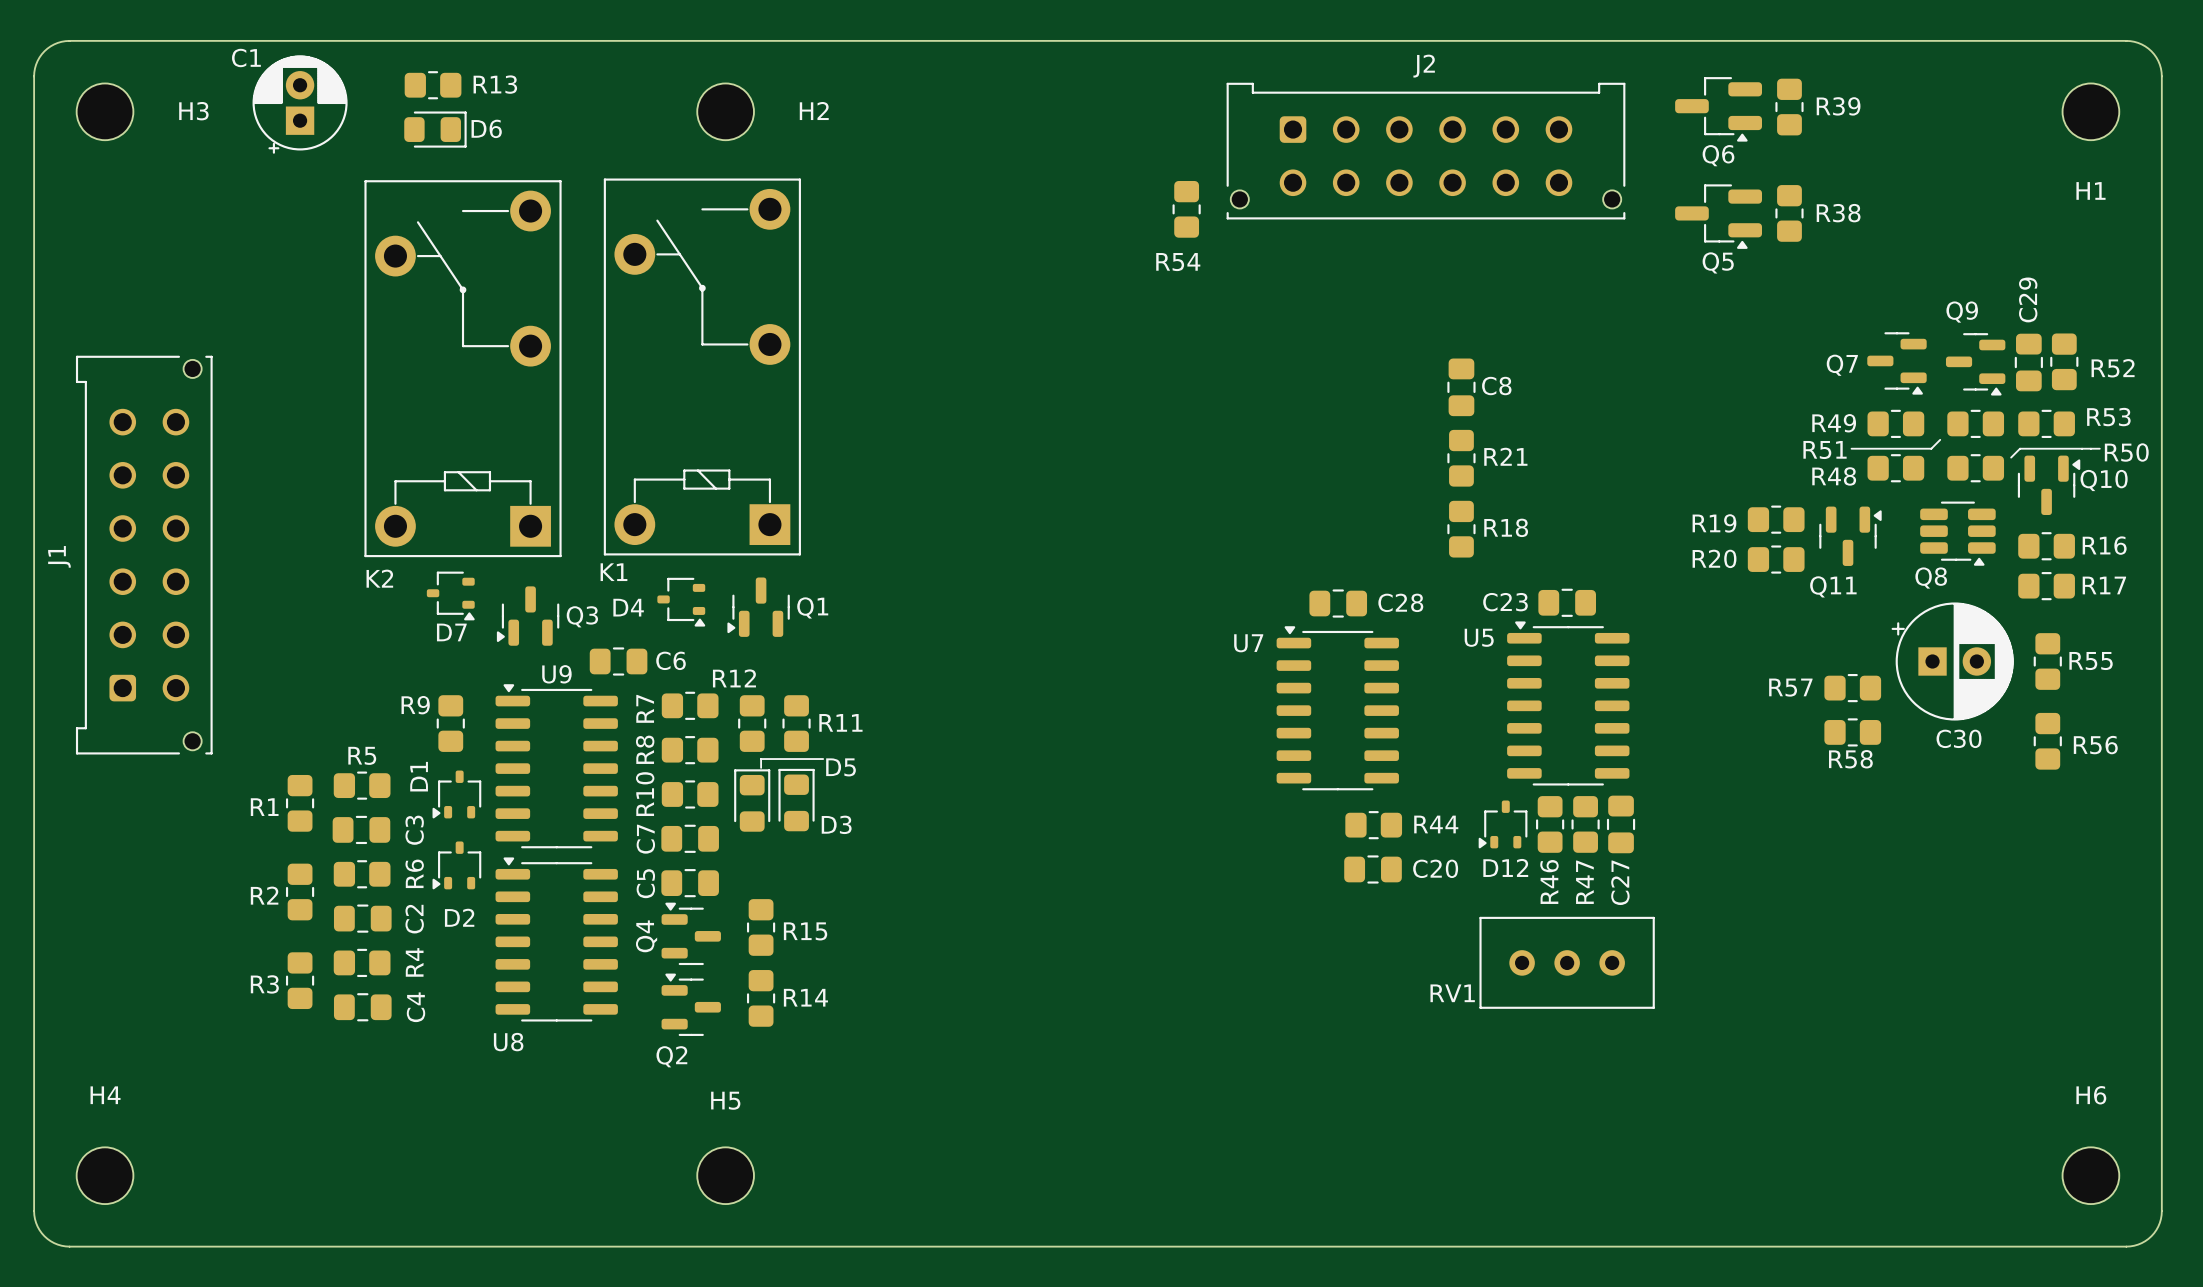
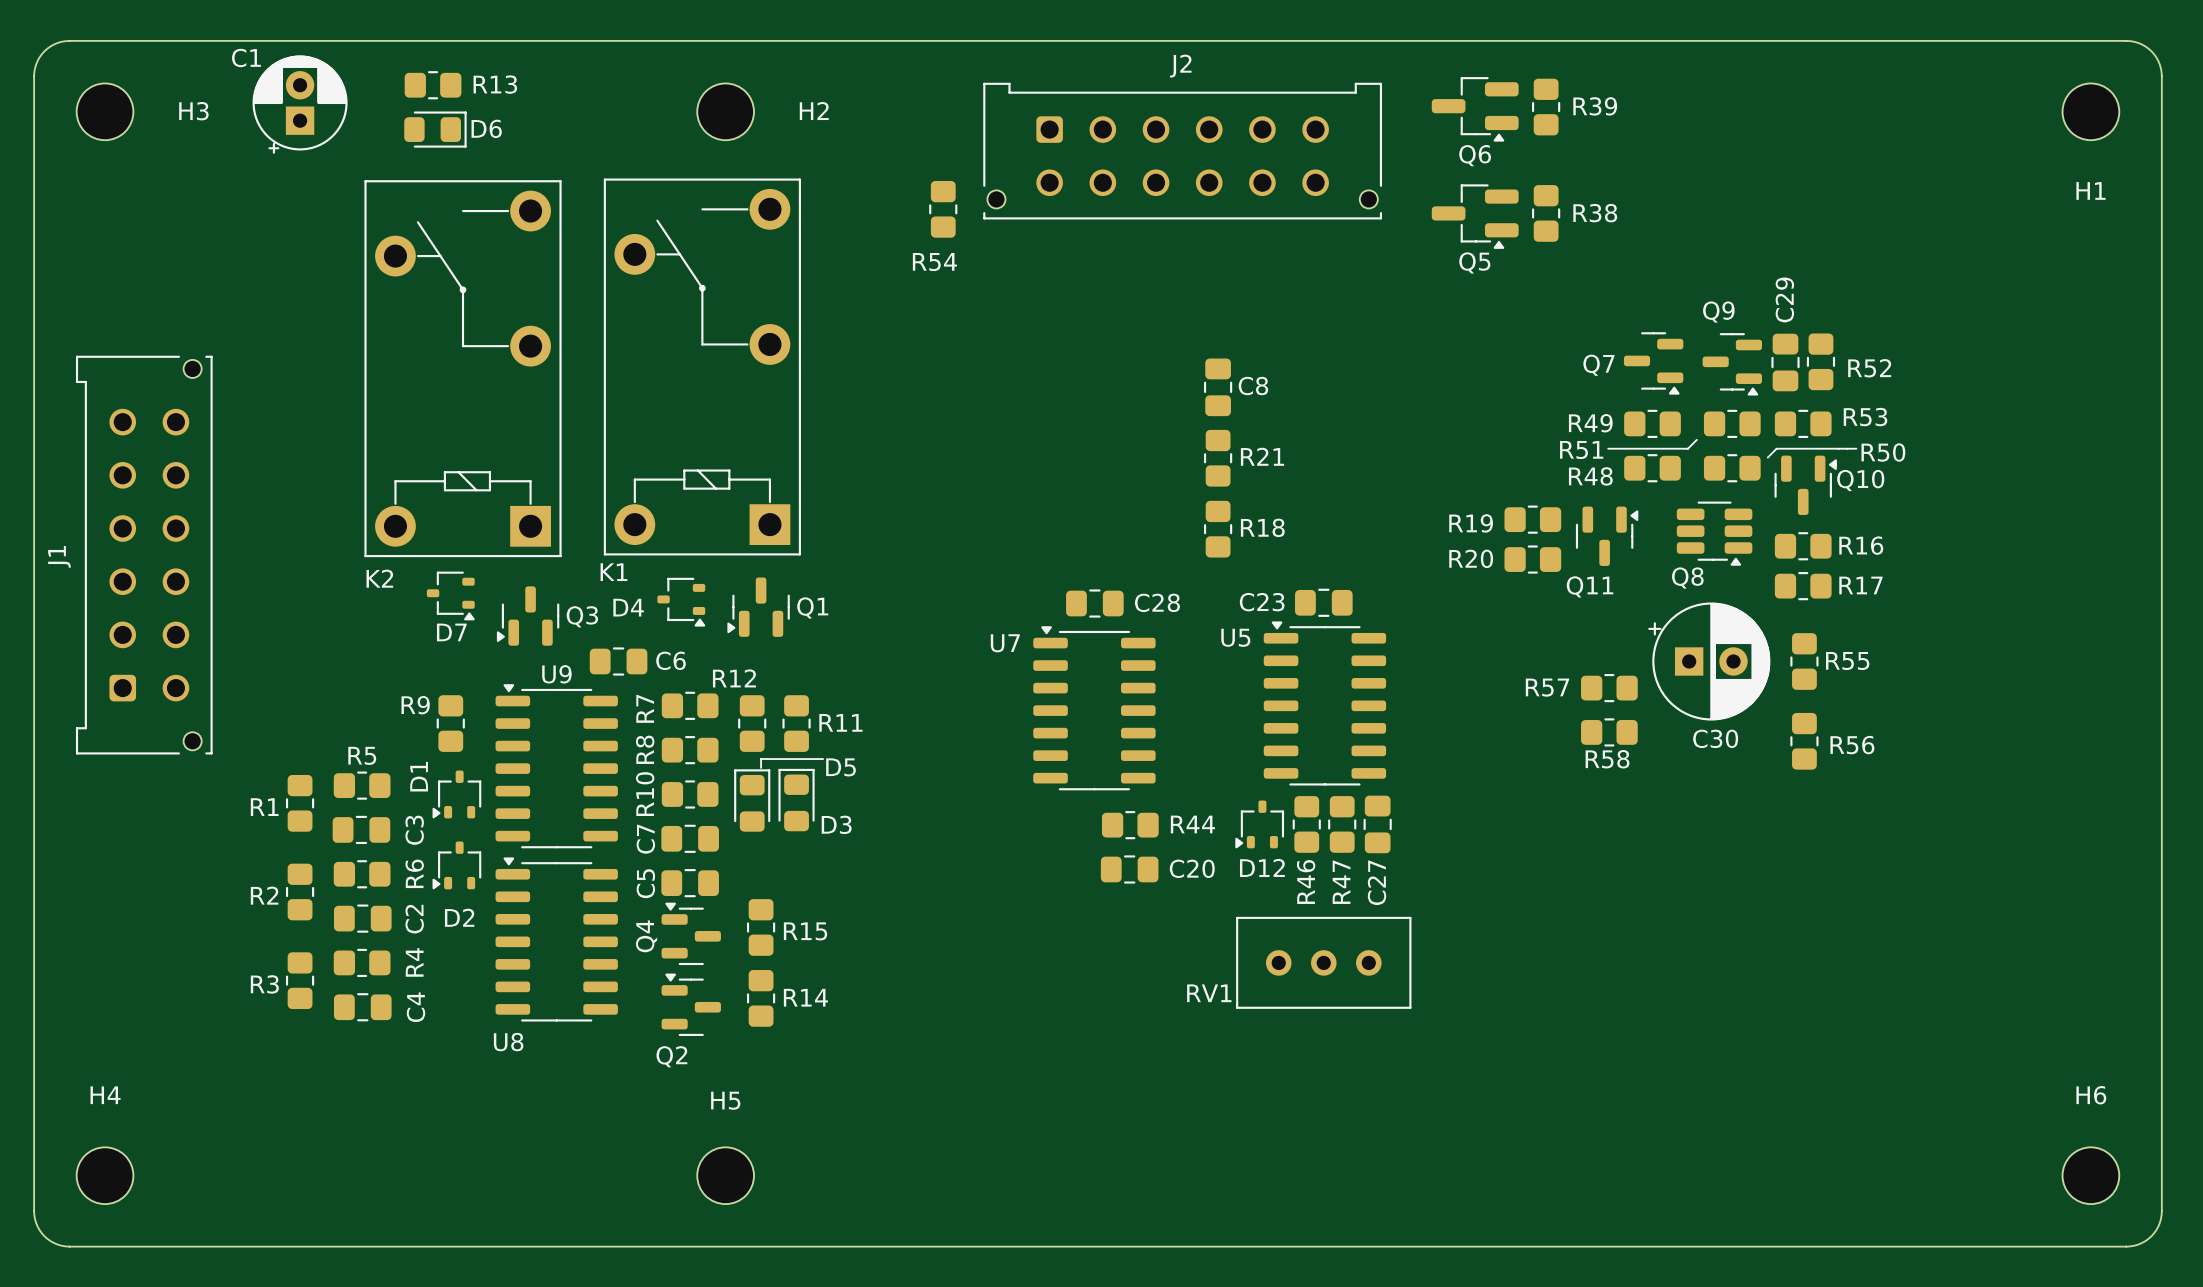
R39 position: (1789, 107) -> (1546, 107)
Q6 position: (1718, 109) -> (1475, 109)
J2 position: (1426, 151) -> (1182, 151)
R54 position: (1186, 209) -> (943, 209)
R38 position: (1789, 213) -> (1546, 213)
Q5 position: (1718, 216) -> (1475, 216)
R52 position: (2064, 361) -> (1820, 361)
C29 position: (2028, 362) -> (1785, 362)
Q7 position: (1896, 363) -> (1653, 363)
Q9 position: (1975, 364) -> (1732, 364)
C8 position: (1461, 387) -> (1218, 387)
R49 position: (1895, 423) -> (1652, 423)
R51 position: (1975, 423) -> (1732, 423)
R53 position: (2046, 423) -> (1803, 423)
line: none -> (1696, 439) (1687, 448) (1608, 448)
line: (1940, 439) (1931, 448) (1856, 448) -> none
line: none -> (1851, 448) (1776, 448) (1767, 457)
line: (2099, 448) (2019, 448) (2011, 457) -> none
R21 position: (1461, 458) -> (1218, 458)
R48 position: (1895, 468) -> (1652, 468)
R50 position: (1975, 468) -> (1732, 468)
Q10 position: (2049, 485) -> (1805, 485)
R19 position: (1776, 519) -> (1532, 519)
R18 position: (1461, 529) -> (1218, 529)
Q8 position: (1957, 533) -> (1714, 533)
Q11 position: (1850, 536) -> (1607, 536)
R16 position: (2046, 546) -> (1803, 546)
R20 position: (1776, 559) -> (1532, 559)
R17 position: (2046, 586) -> (1803, 586)
C23 position: (1567, 602) -> (1323, 602)
C28 position: (1338, 603) -> (1094, 603)
C30 position: (1952, 661) -> (1709, 661)
R55 position: (2047, 661) -> (1804, 661)
R57 position: (1852, 688) -> (1609, 688)
U5 position: (1568, 703) -> (1324, 703)
U7 position: (1337, 708) -> (1094, 708)
R58 position: (1852, 732) -> (1609, 732)
R56 position: (2047, 741) -> (1804, 741)
D12 position: (1503, 824) -> (1259, 824)
R46 position: (1550, 824) -> (1306, 824)
R47 position: (1585, 824) -> (1342, 824)
C27 position: (1621, 824) -> (1377, 824)
R44 position: (1373, 825) -> (1130, 825)
C20 position: (1373, 869) -> (1129, 869)
RV1 position: (1567, 962) -> (1323, 962)

